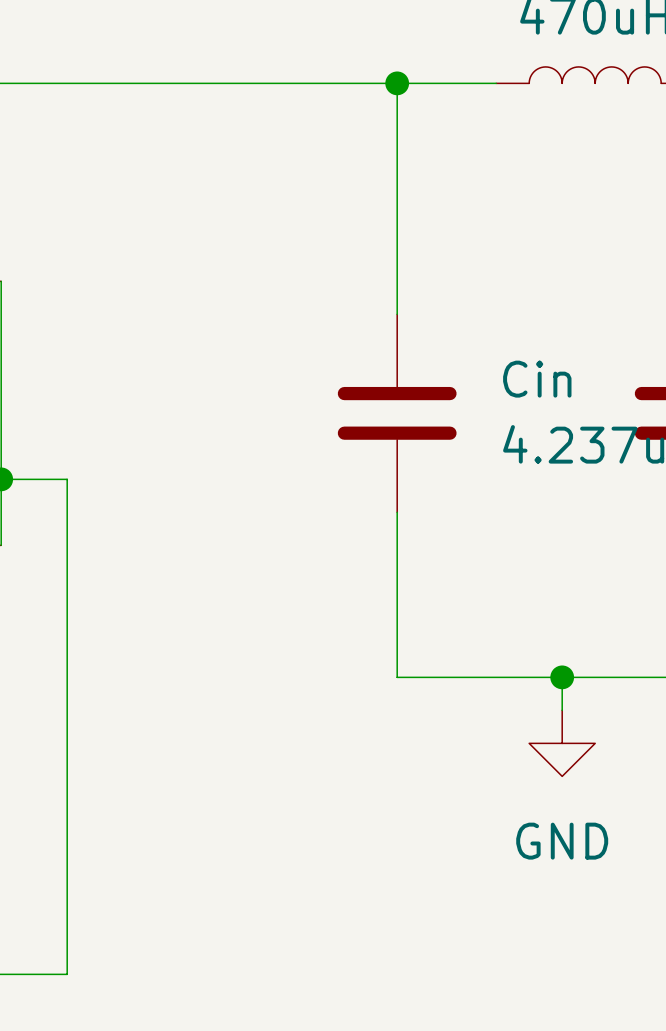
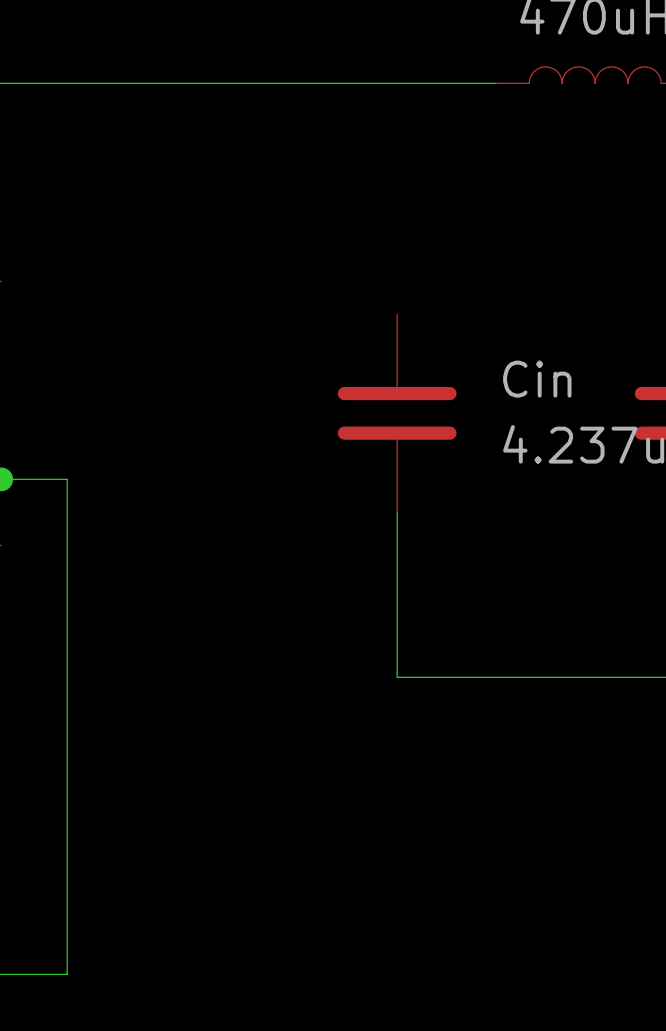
wire: (397, 83) (397, 314) -> none
junction: (397, 83) -> none
wire: (1, 281) (1, 545) -> none
wire: (562, 677) (562, 710) -> none
junction: (562, 677) -> none
power symbol: GND (562, 743) -> none

